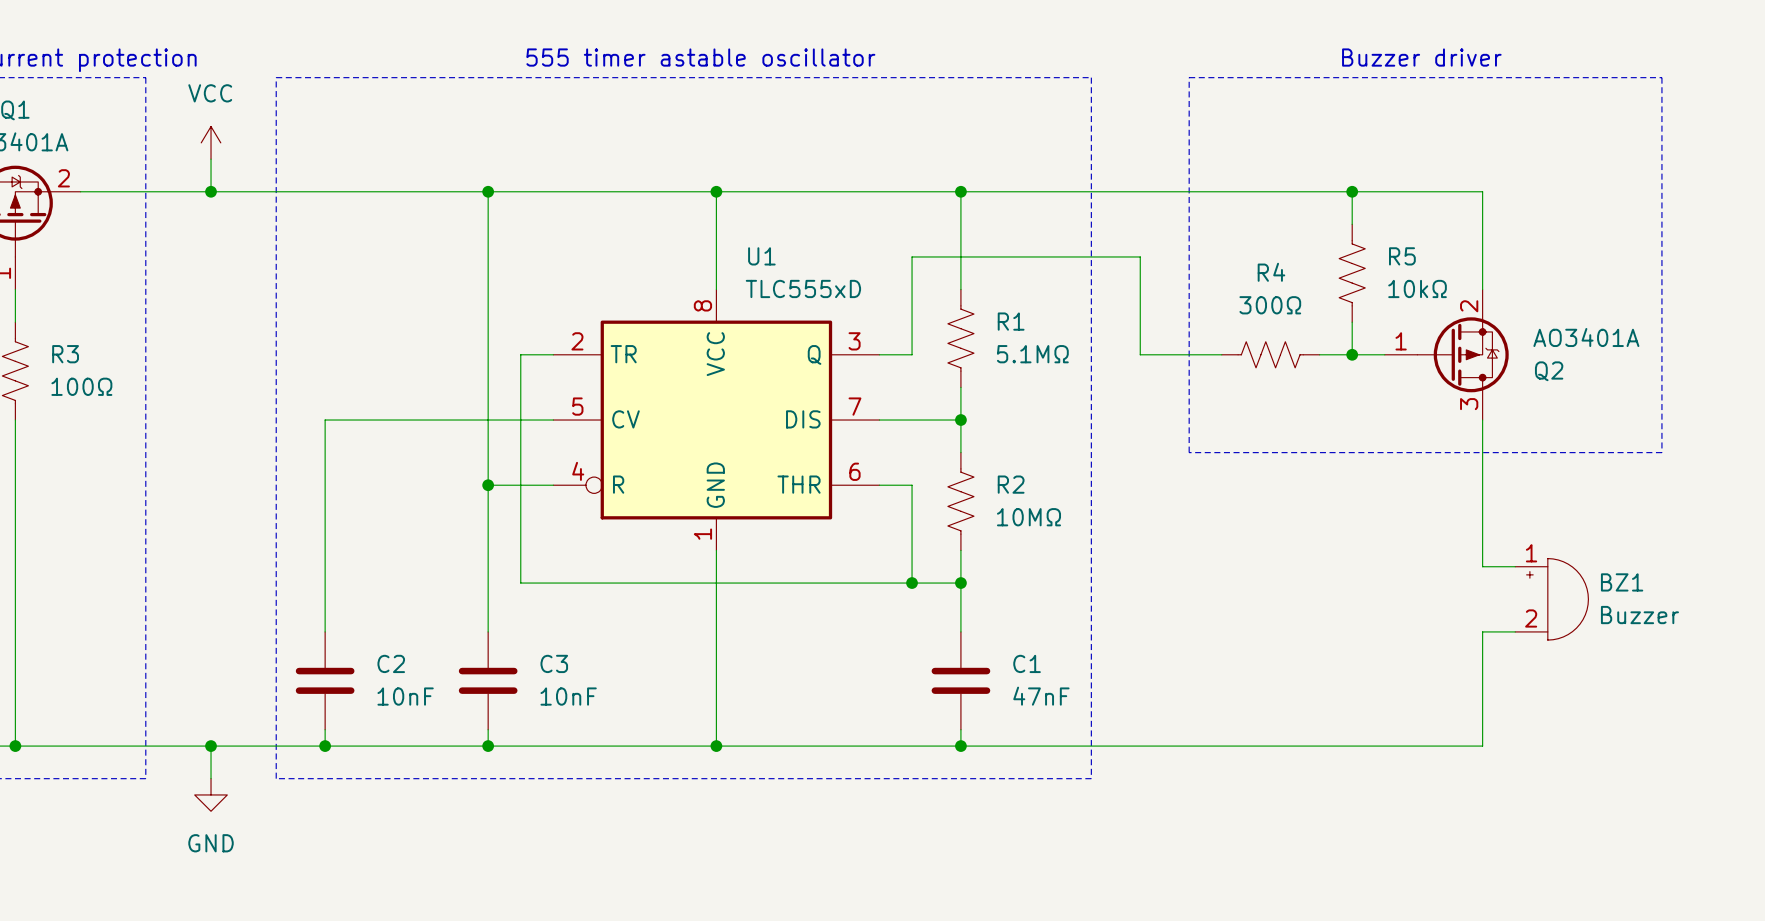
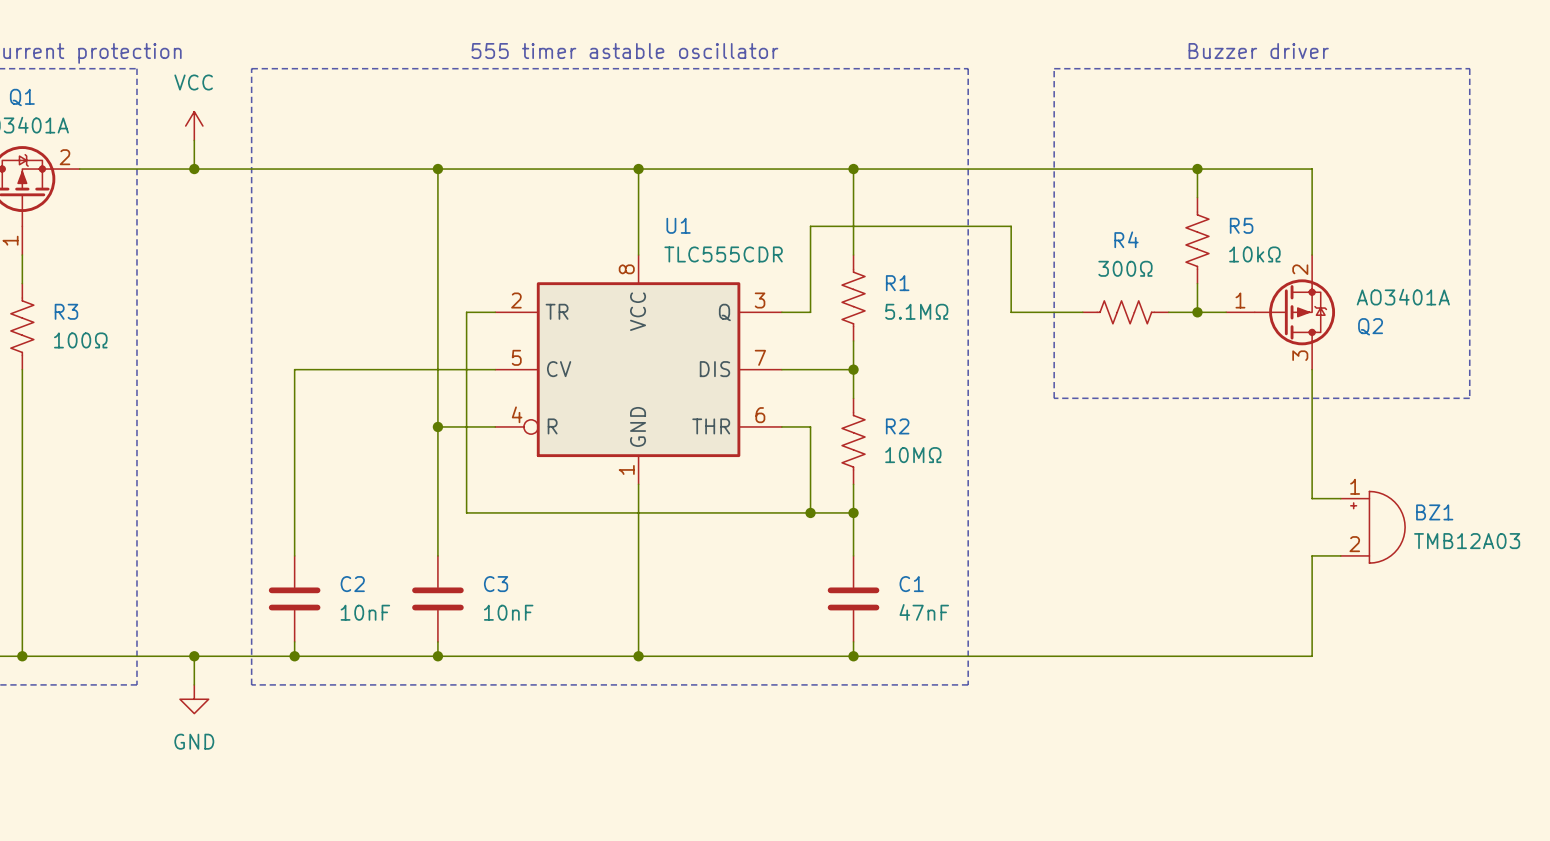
U1 value: TLC555xD (803, 288) -> TLC555CDR (723, 254)
BZ1 value: Buzzer (1639, 615) -> TMB12A03 (1467, 541)

